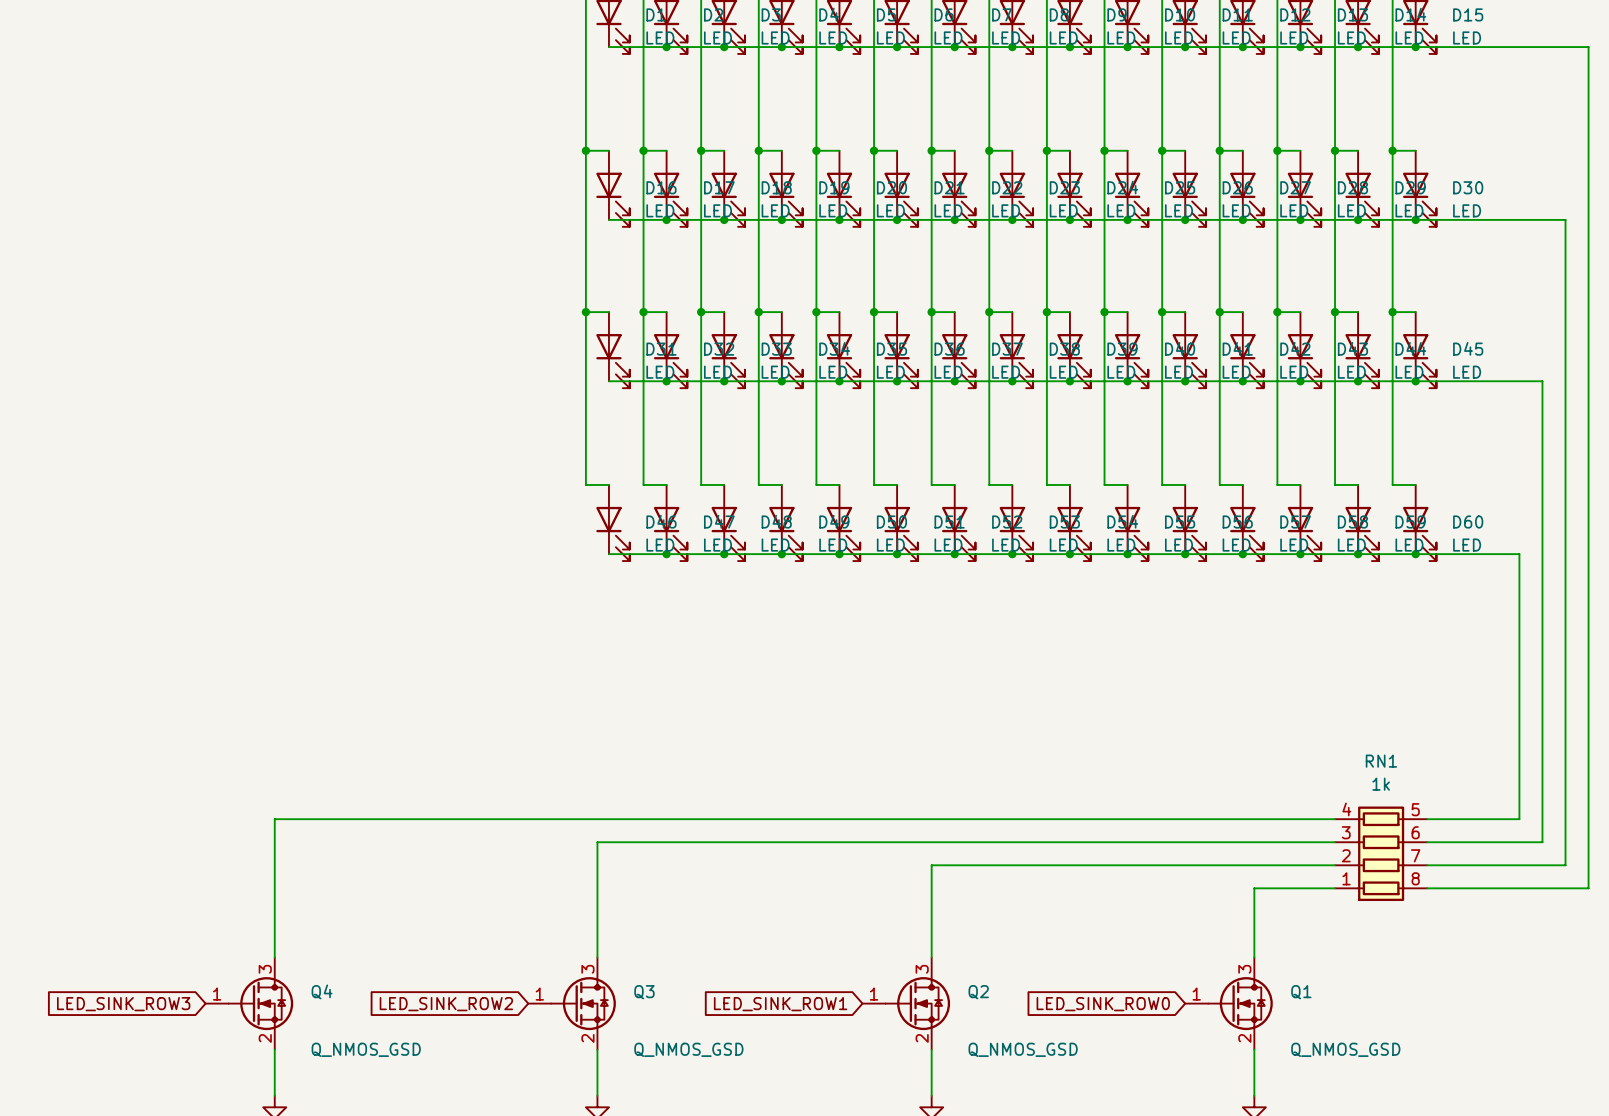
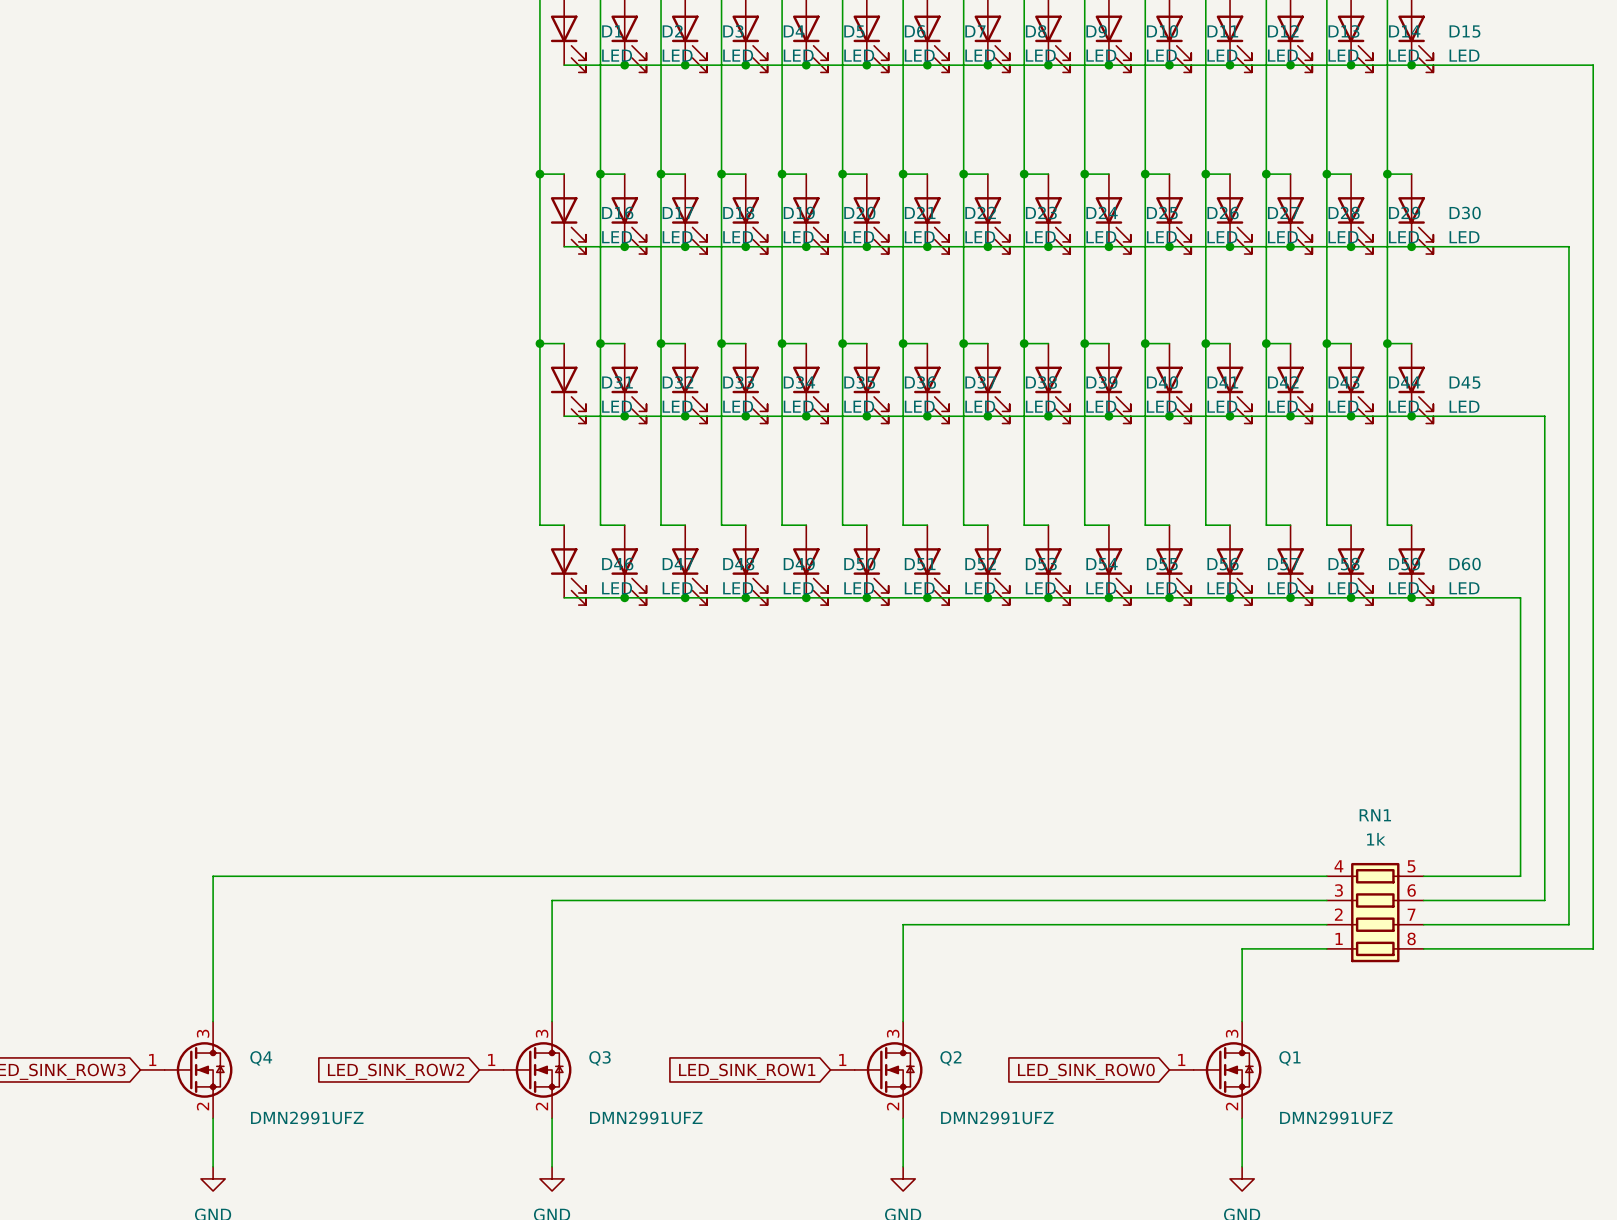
Q4 value: Q_NMOS_GSD (366, 1049) -> DMN2991UFZ (307, 1117)
Q3 value: Q_NMOS_GSD (688, 1049) -> DMN2991UFZ (646, 1117)
Q2 value: Q_NMOS_GSD (1023, 1049) -> DMN2991UFZ (997, 1117)
Q1 value: Q_NMOS_GSD (1345, 1049) -> DMN2991UFZ (1336, 1117)

